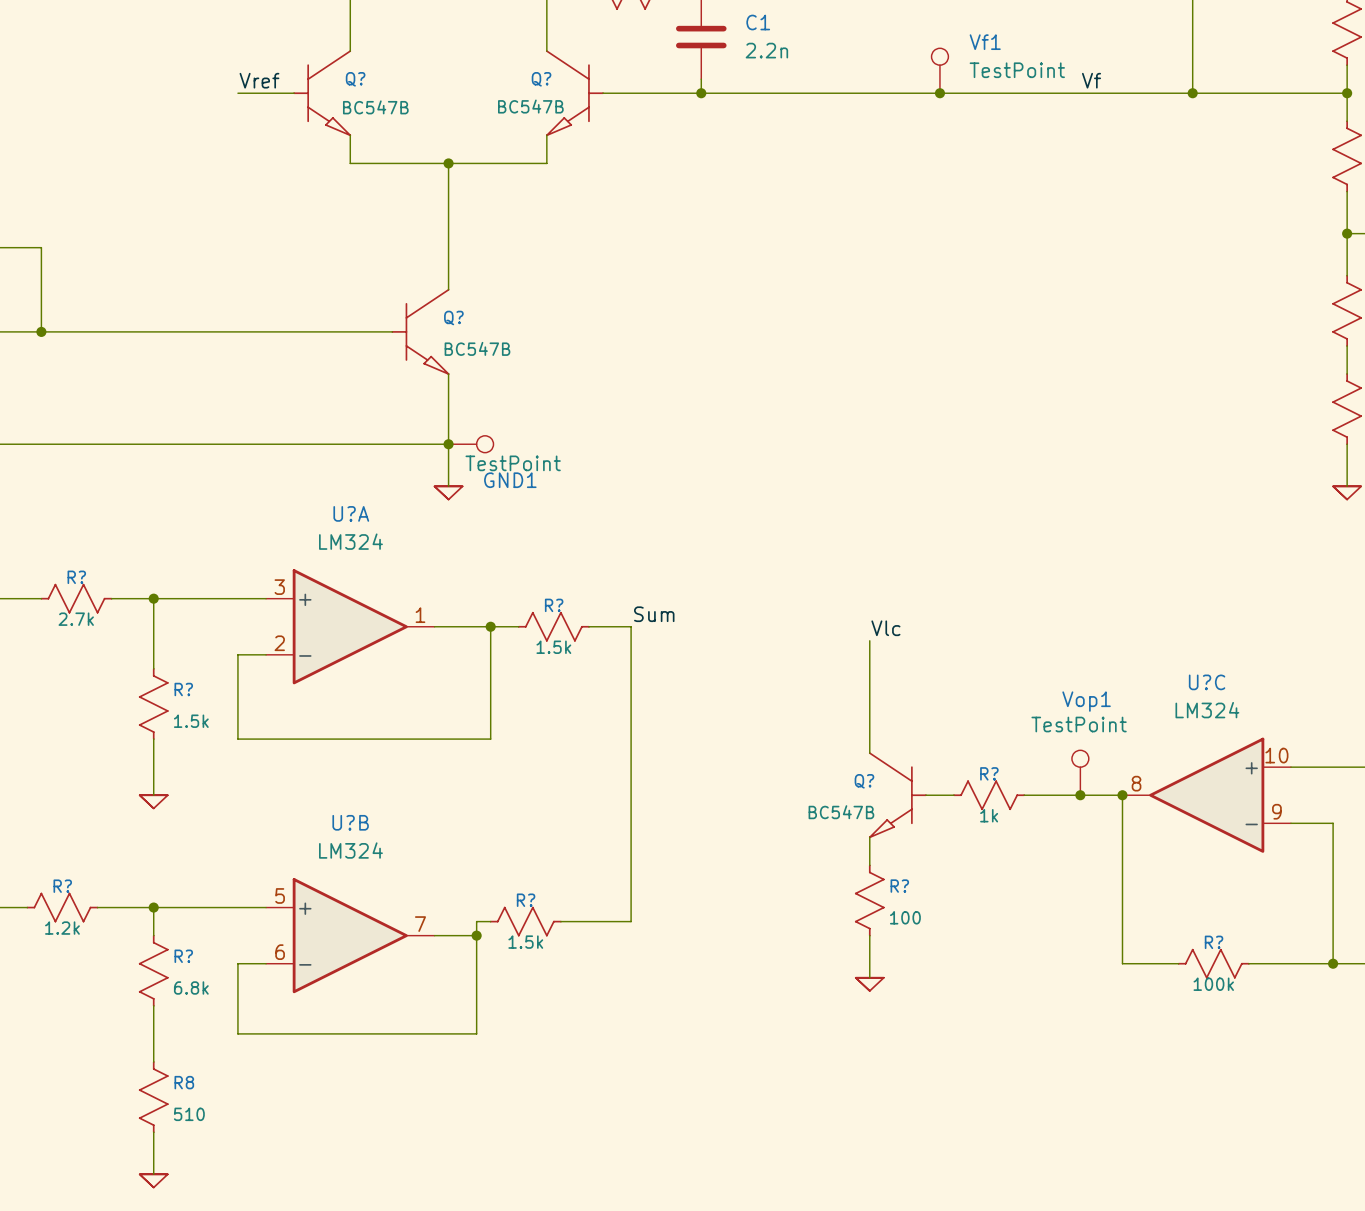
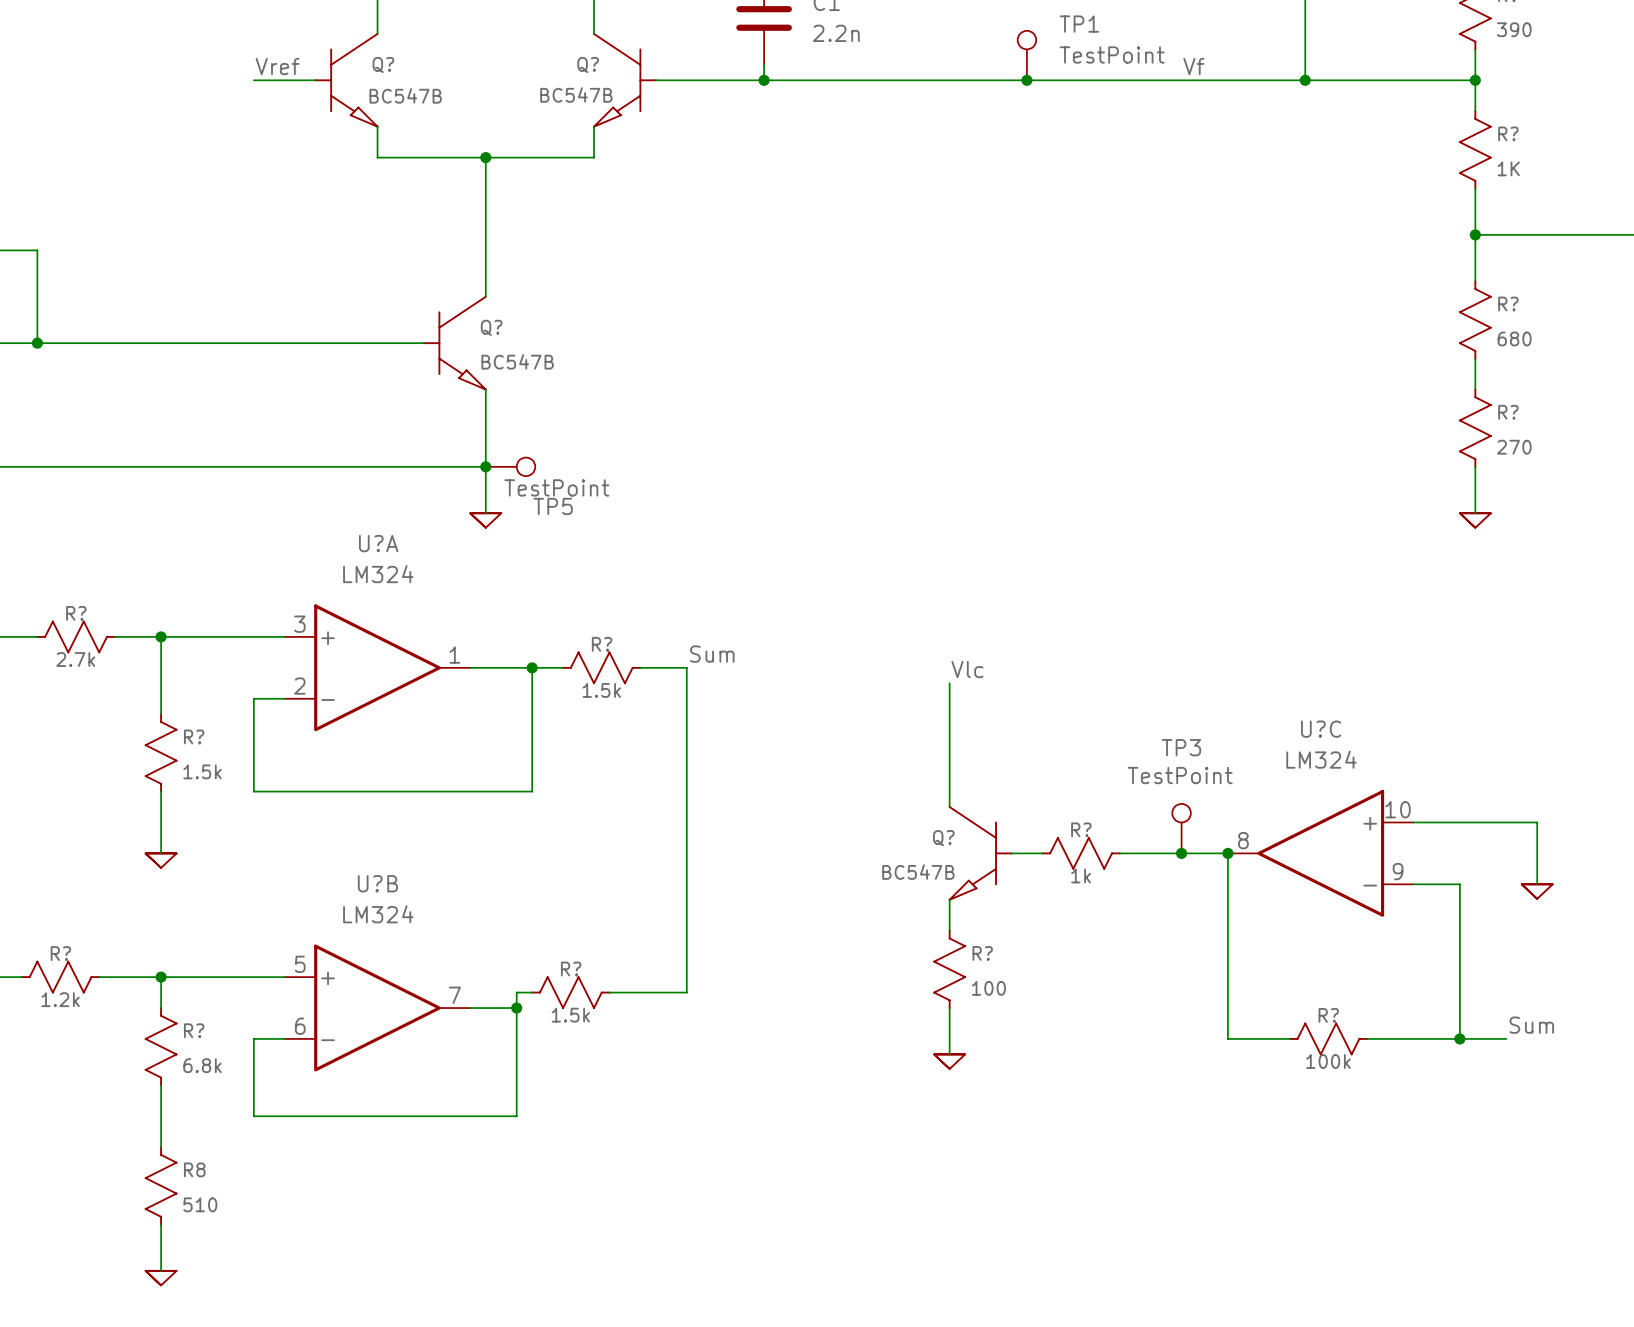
Vf1 name: Vf1 (985, 42) -> TP1 (1079, 24)
GND1 name: GND1 (510, 480) -> TP5 (553, 506)
Vop1 name: Vop1 (1086, 701) -> TP3 (1181, 747)

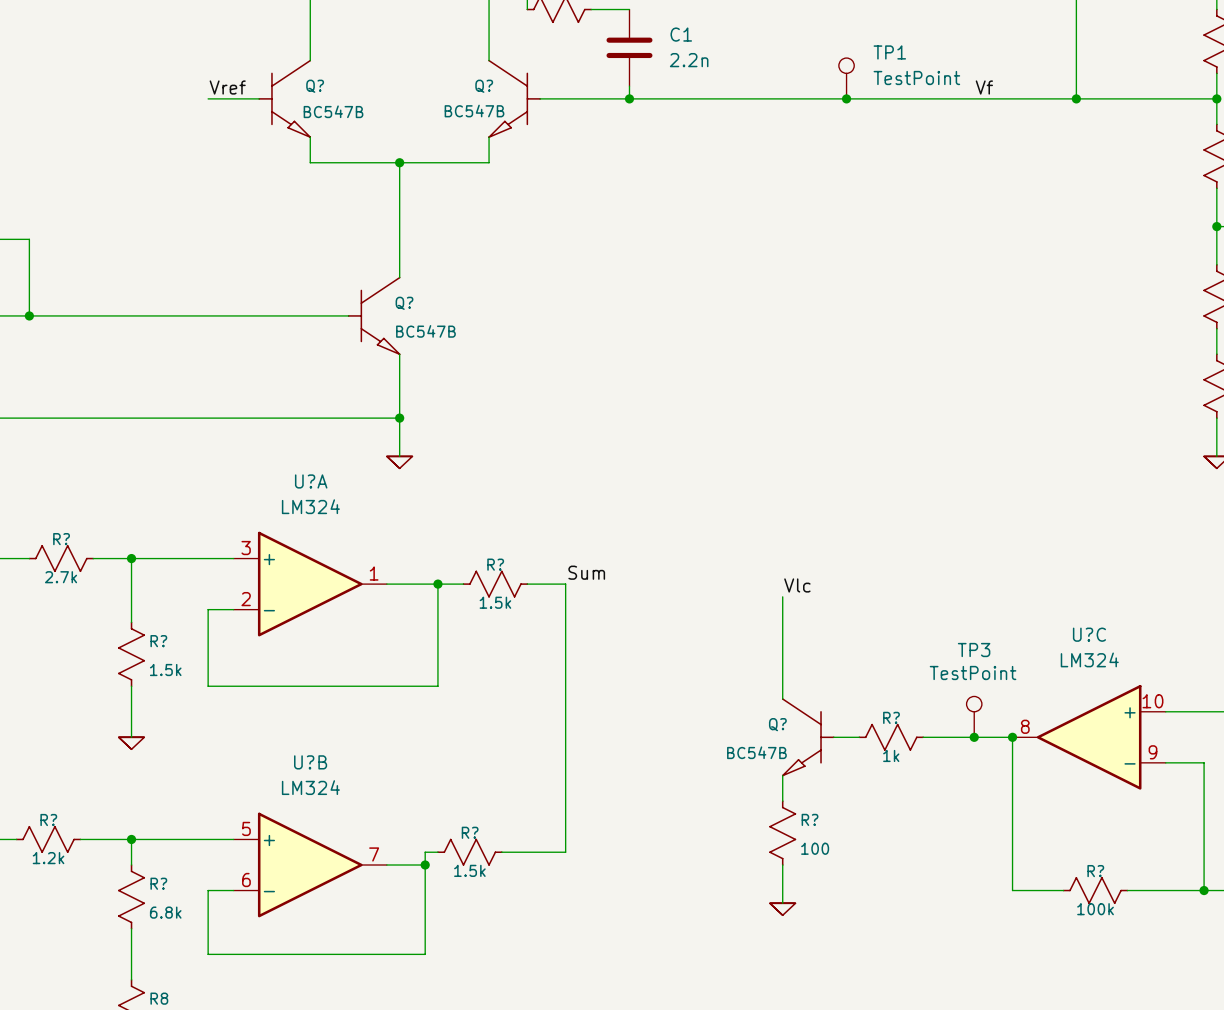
TP5: TestPoint (510, 466) -> none

